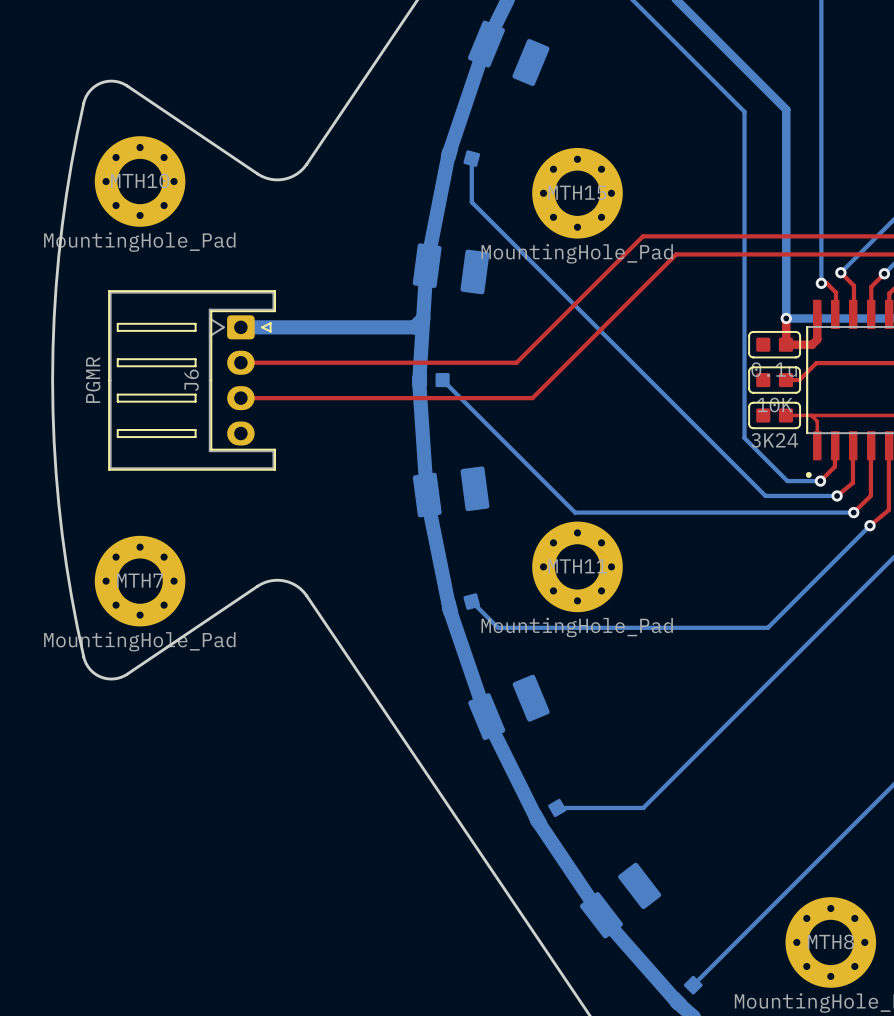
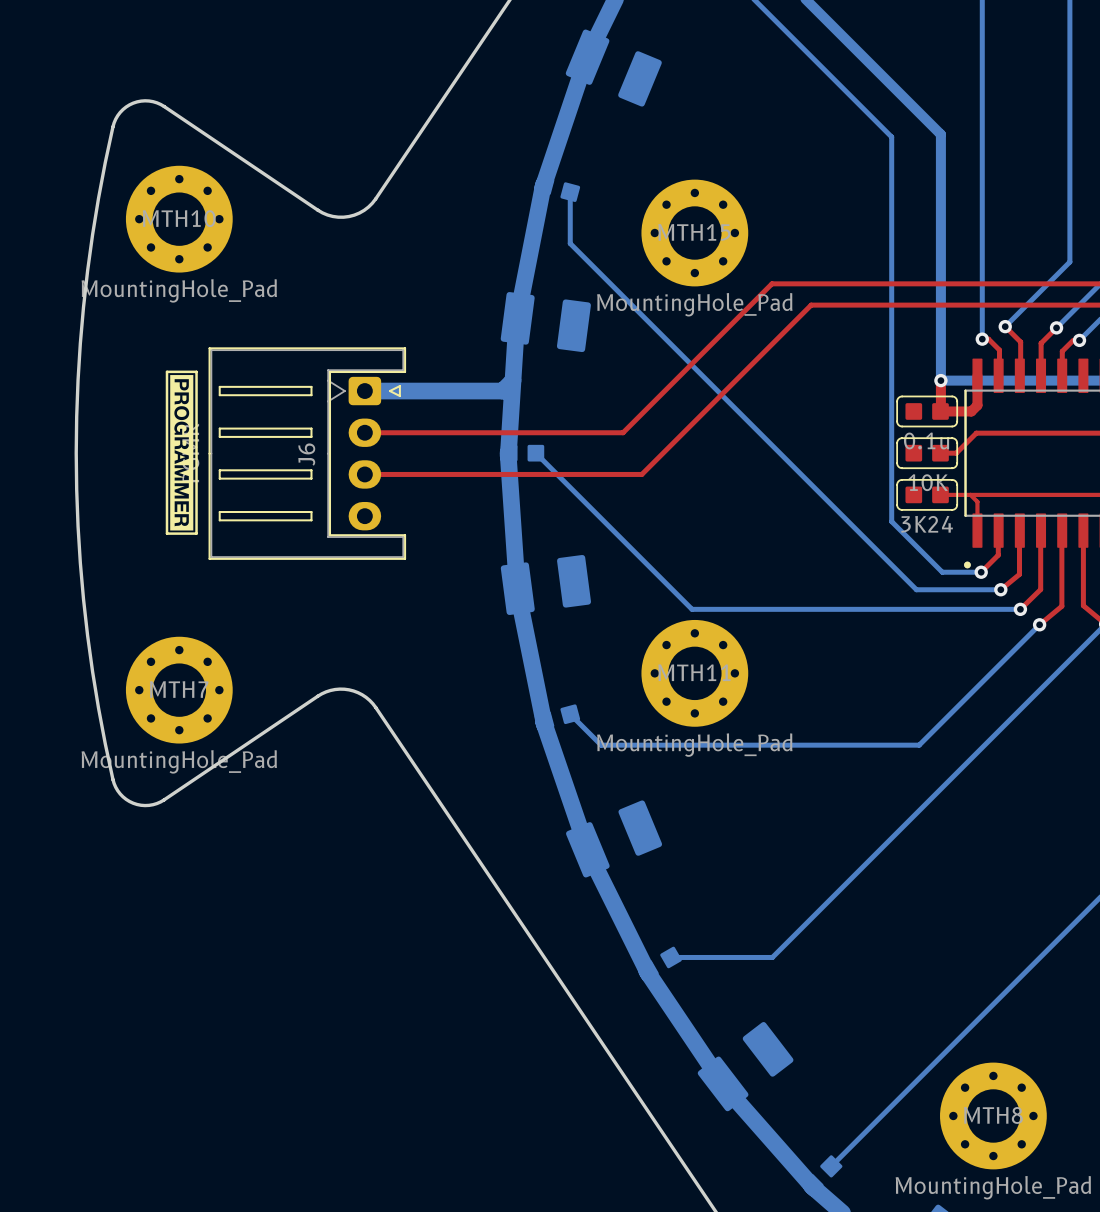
line: none -> (167, 371) (196, 371) (196, 533) (167, 533) (167, 371)
drawing: none -> [170, 375, 194, 531]
bottom track: (240, 327) (297, 327) -> none
top track: (240, 362) (297, 362) -> none
J6 position: (192, 380) -> (307, 453)
top track: (240, 398) (297, 398) -> none

